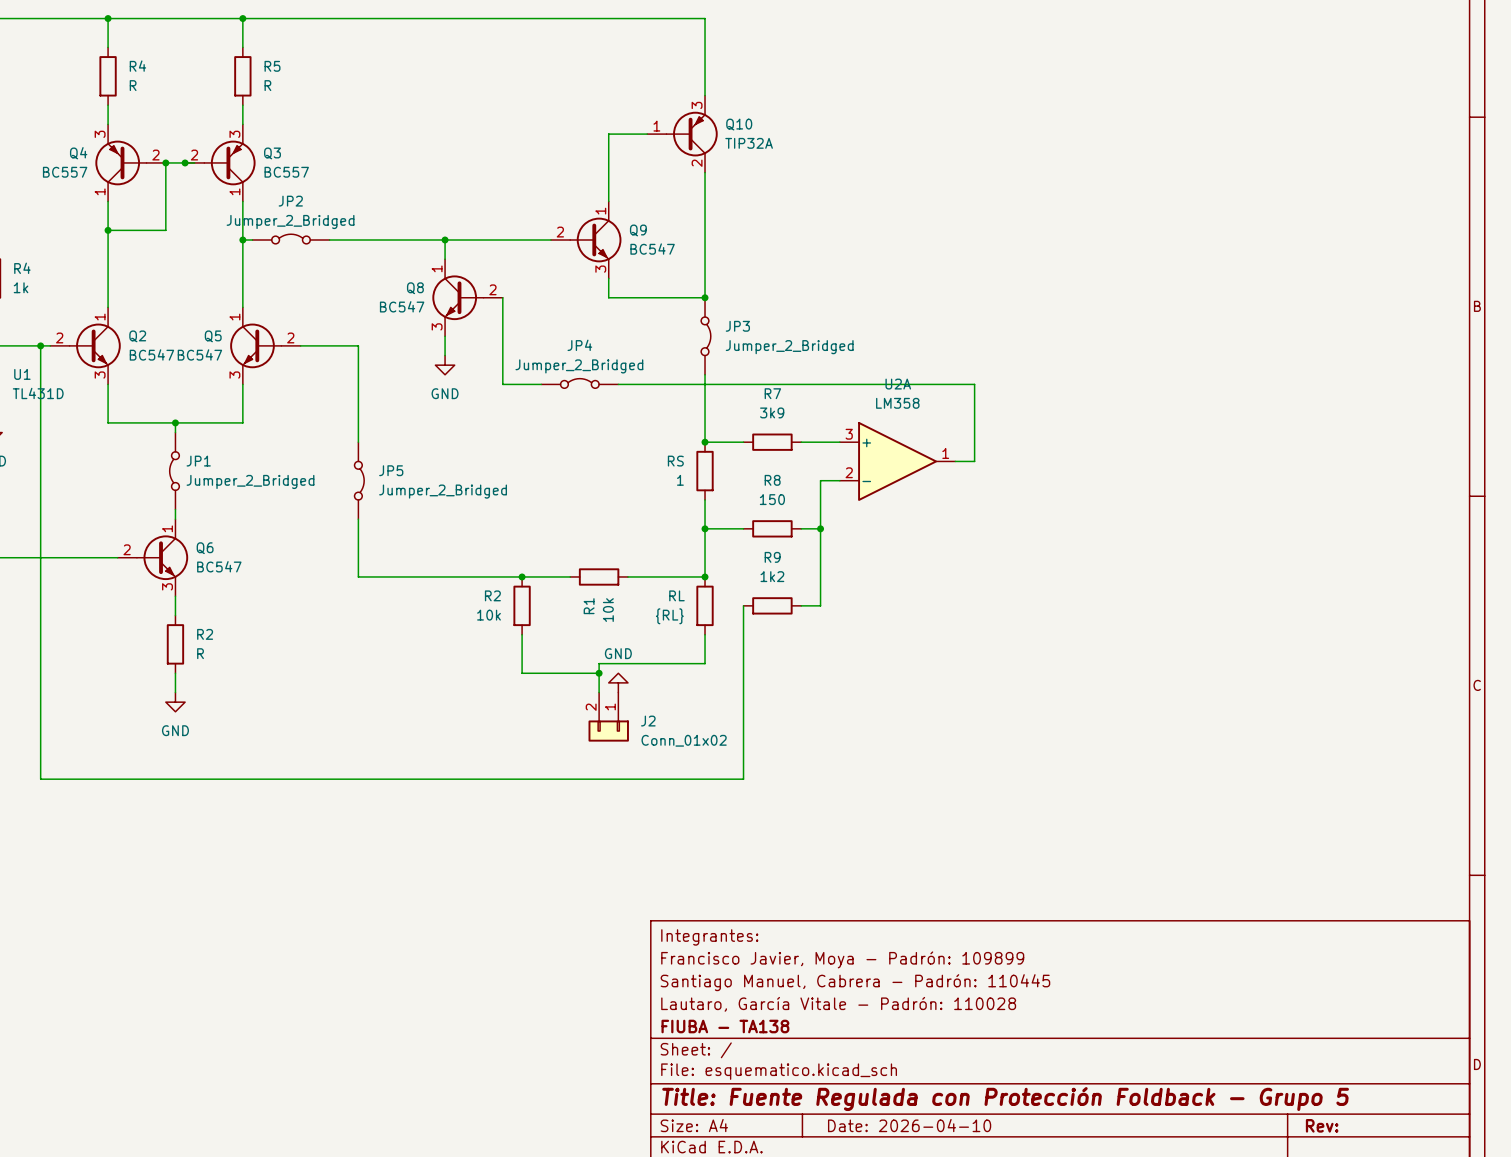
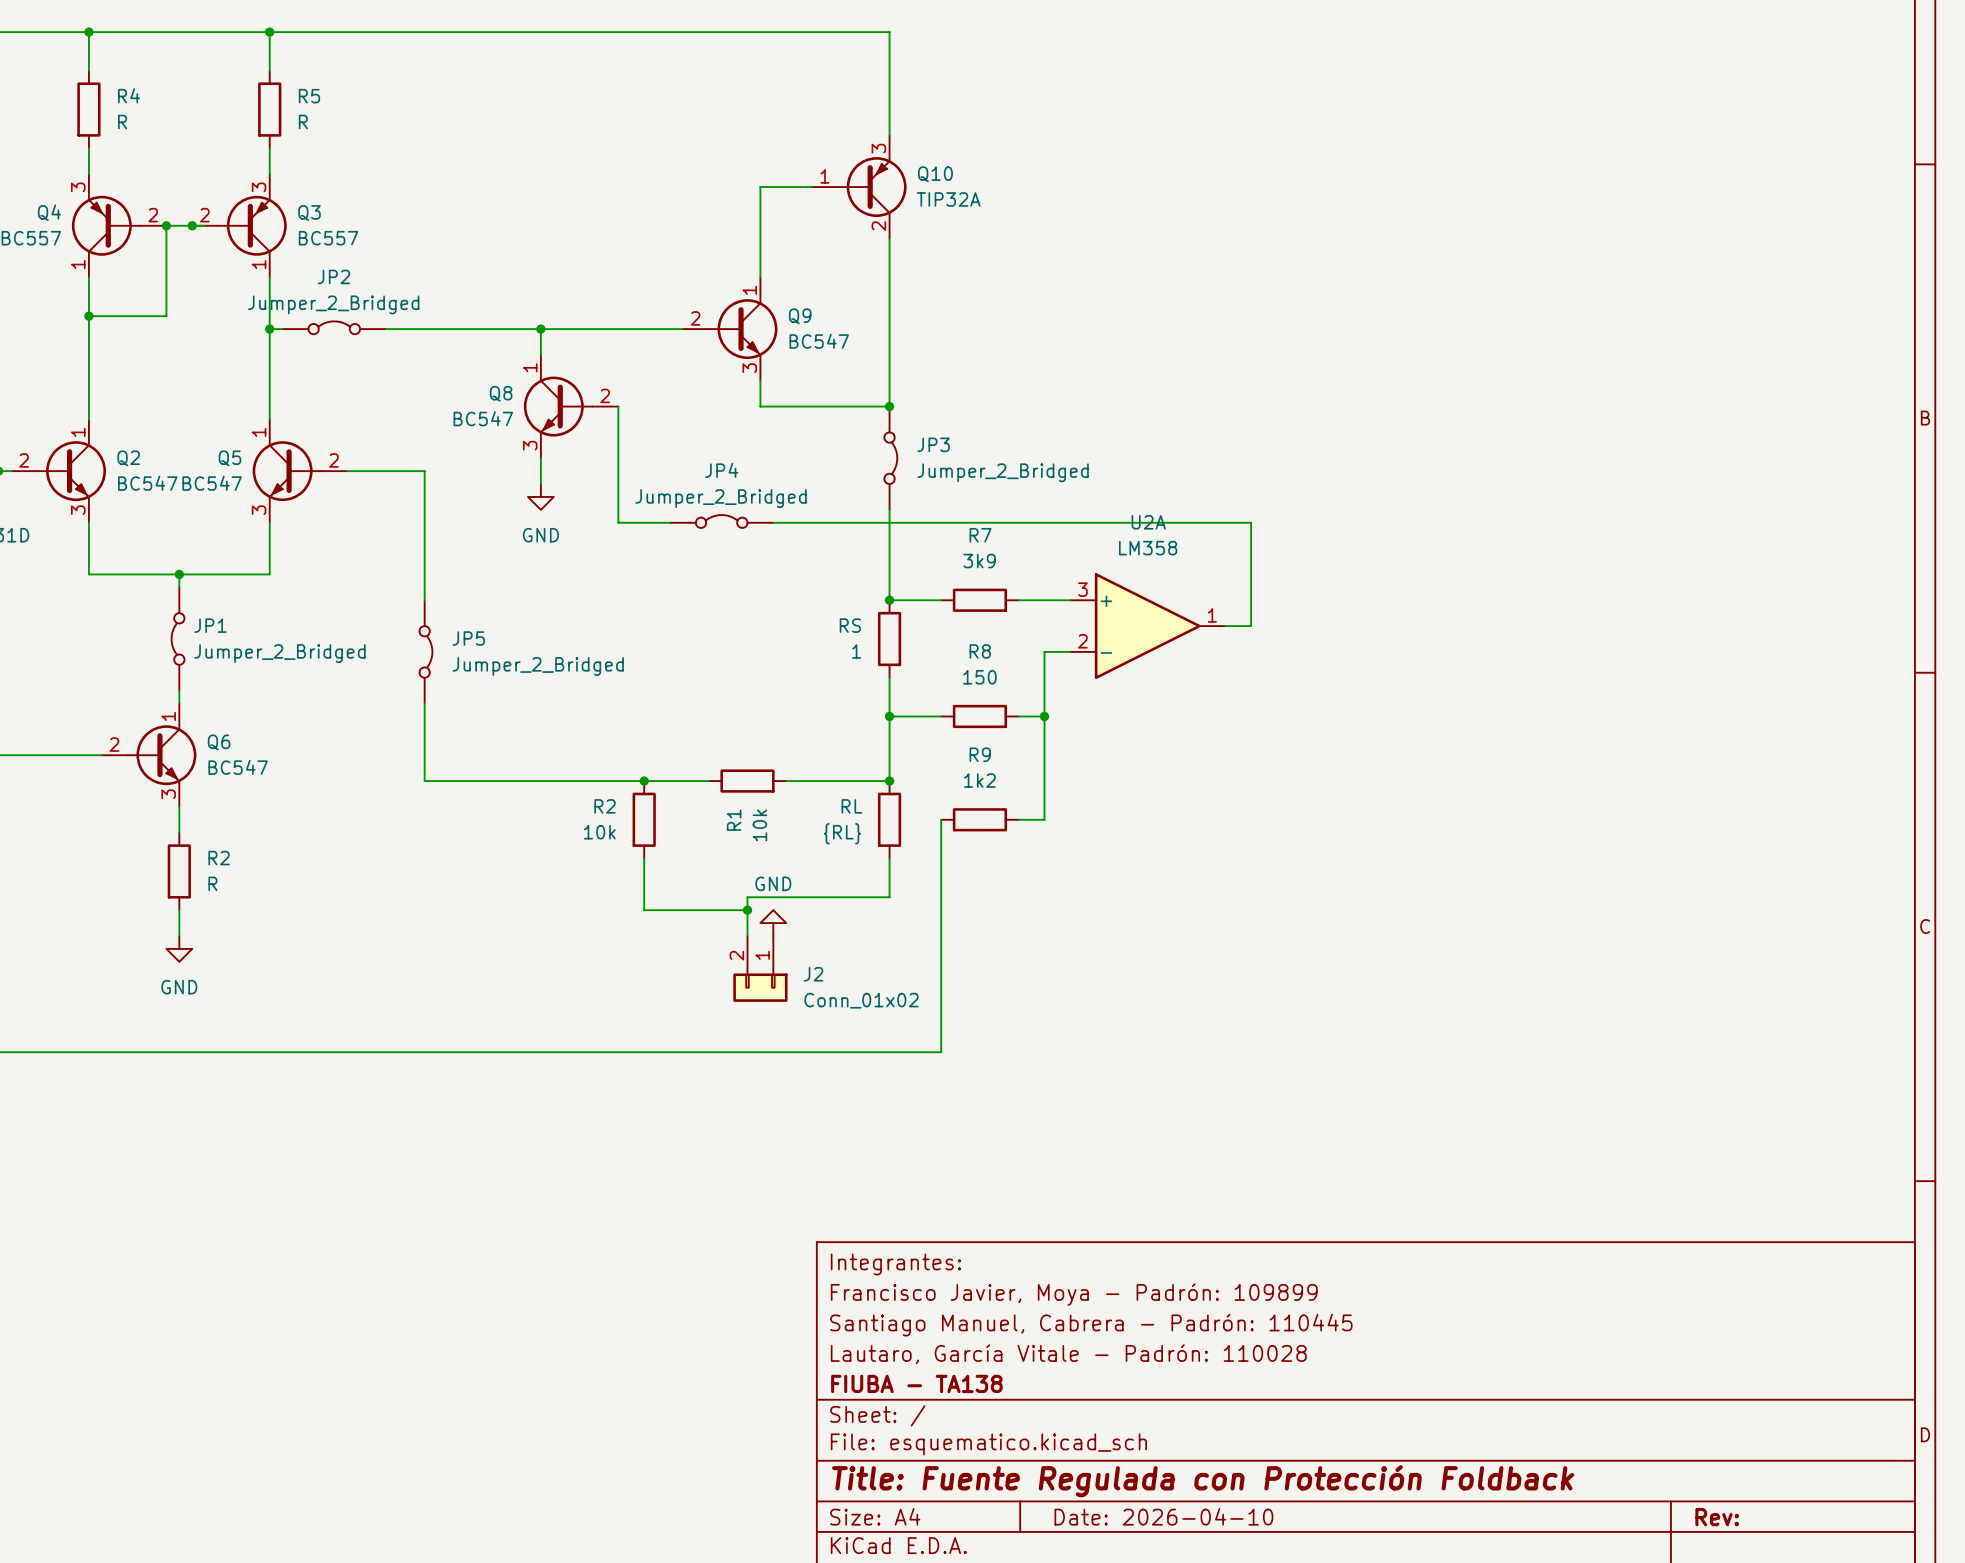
title block: Title: Fuente Regulada con Protección Foldback - Grupo 5 (1005, 1099) -> Title: Fuente Regulada con Protección Foldback (1203, 1481)

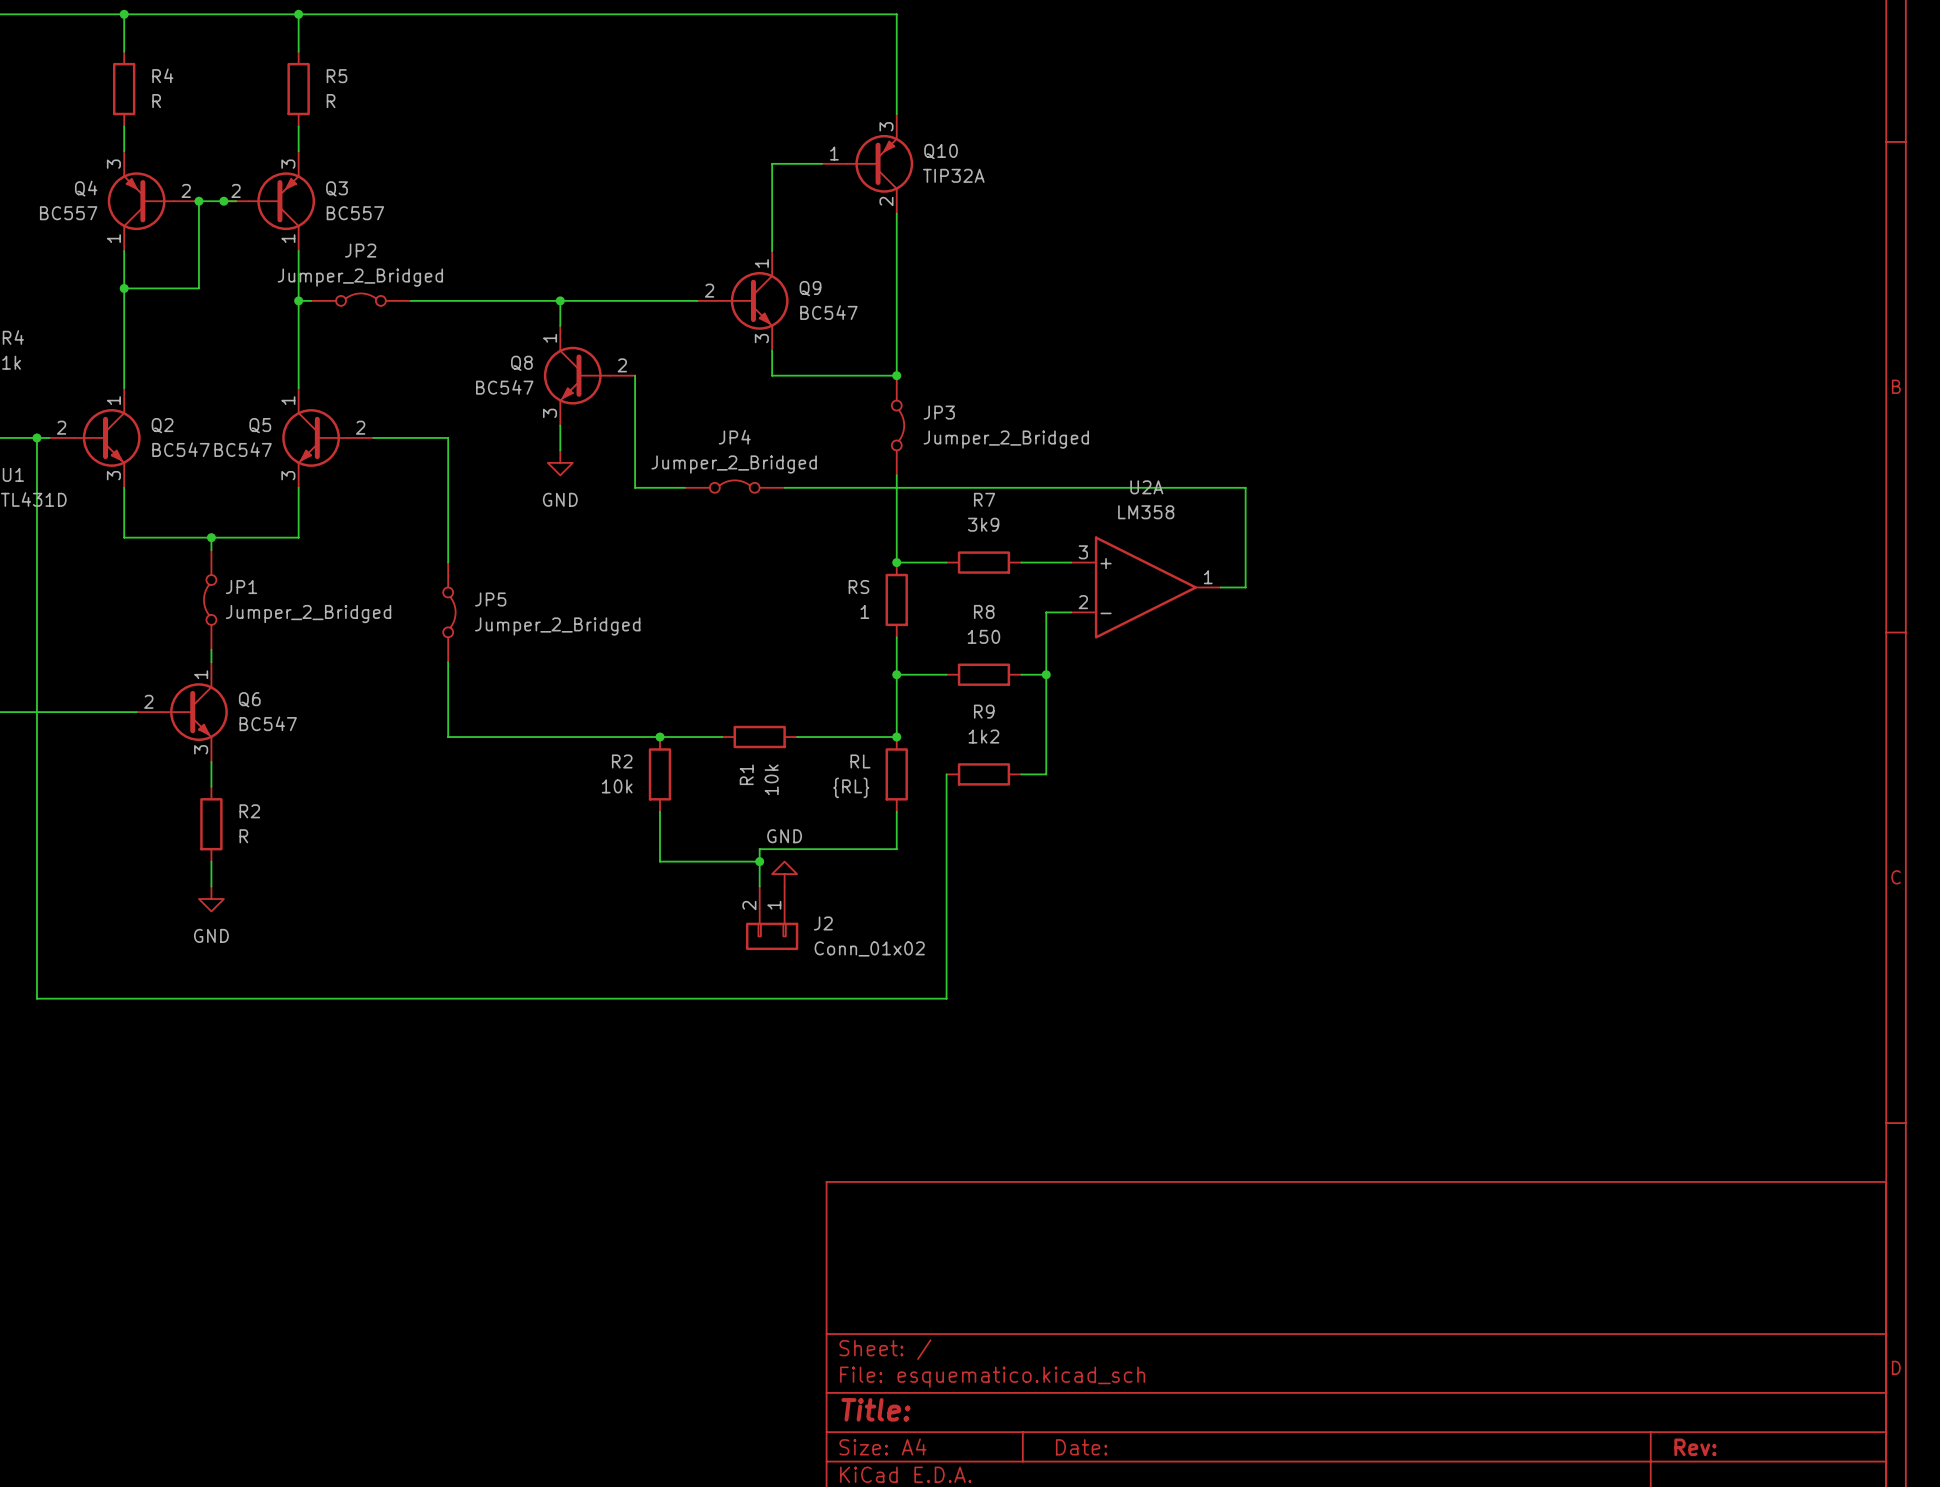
title block: Integrantes: (895, 1264) -> none
title block: Francisco Javier, Moya - Padrón: 109899 (1074, 1294) -> none
title block: Santiago Manuel, Cabrera - Padrón: 110445 (1091, 1325) -> none
title block: Lautaro, García Vitale - Padrón: 110028 (1068, 1354) -> none
title block: FIUBA - TA138 (916, 1383) -> none
title block: Title: Fuente Regulada con Protección Foldback (1203, 1481) -> Title: (875, 1409)
title block: Date: 2026-04-10 (1163, 1516) -> Date: (1081, 1447)

